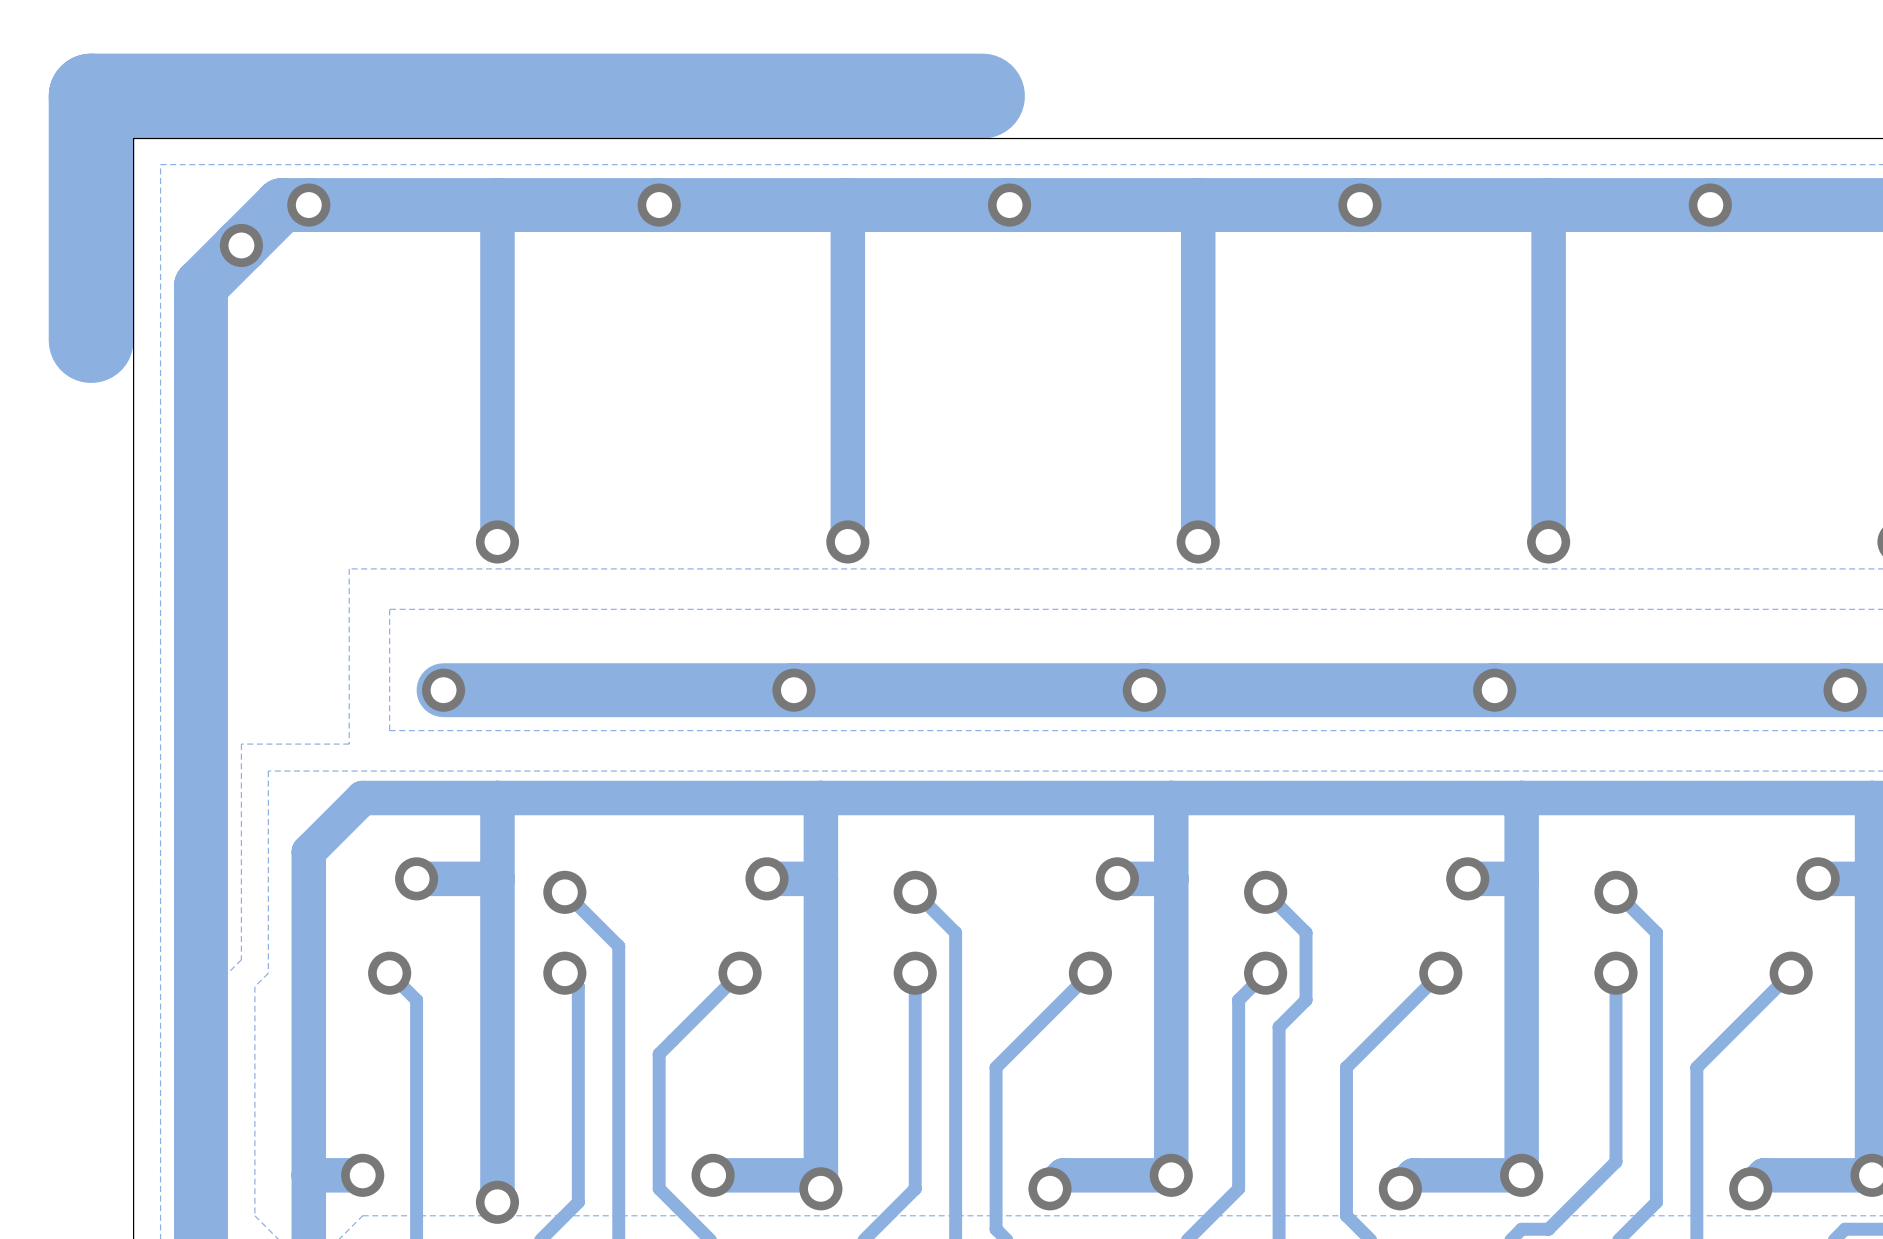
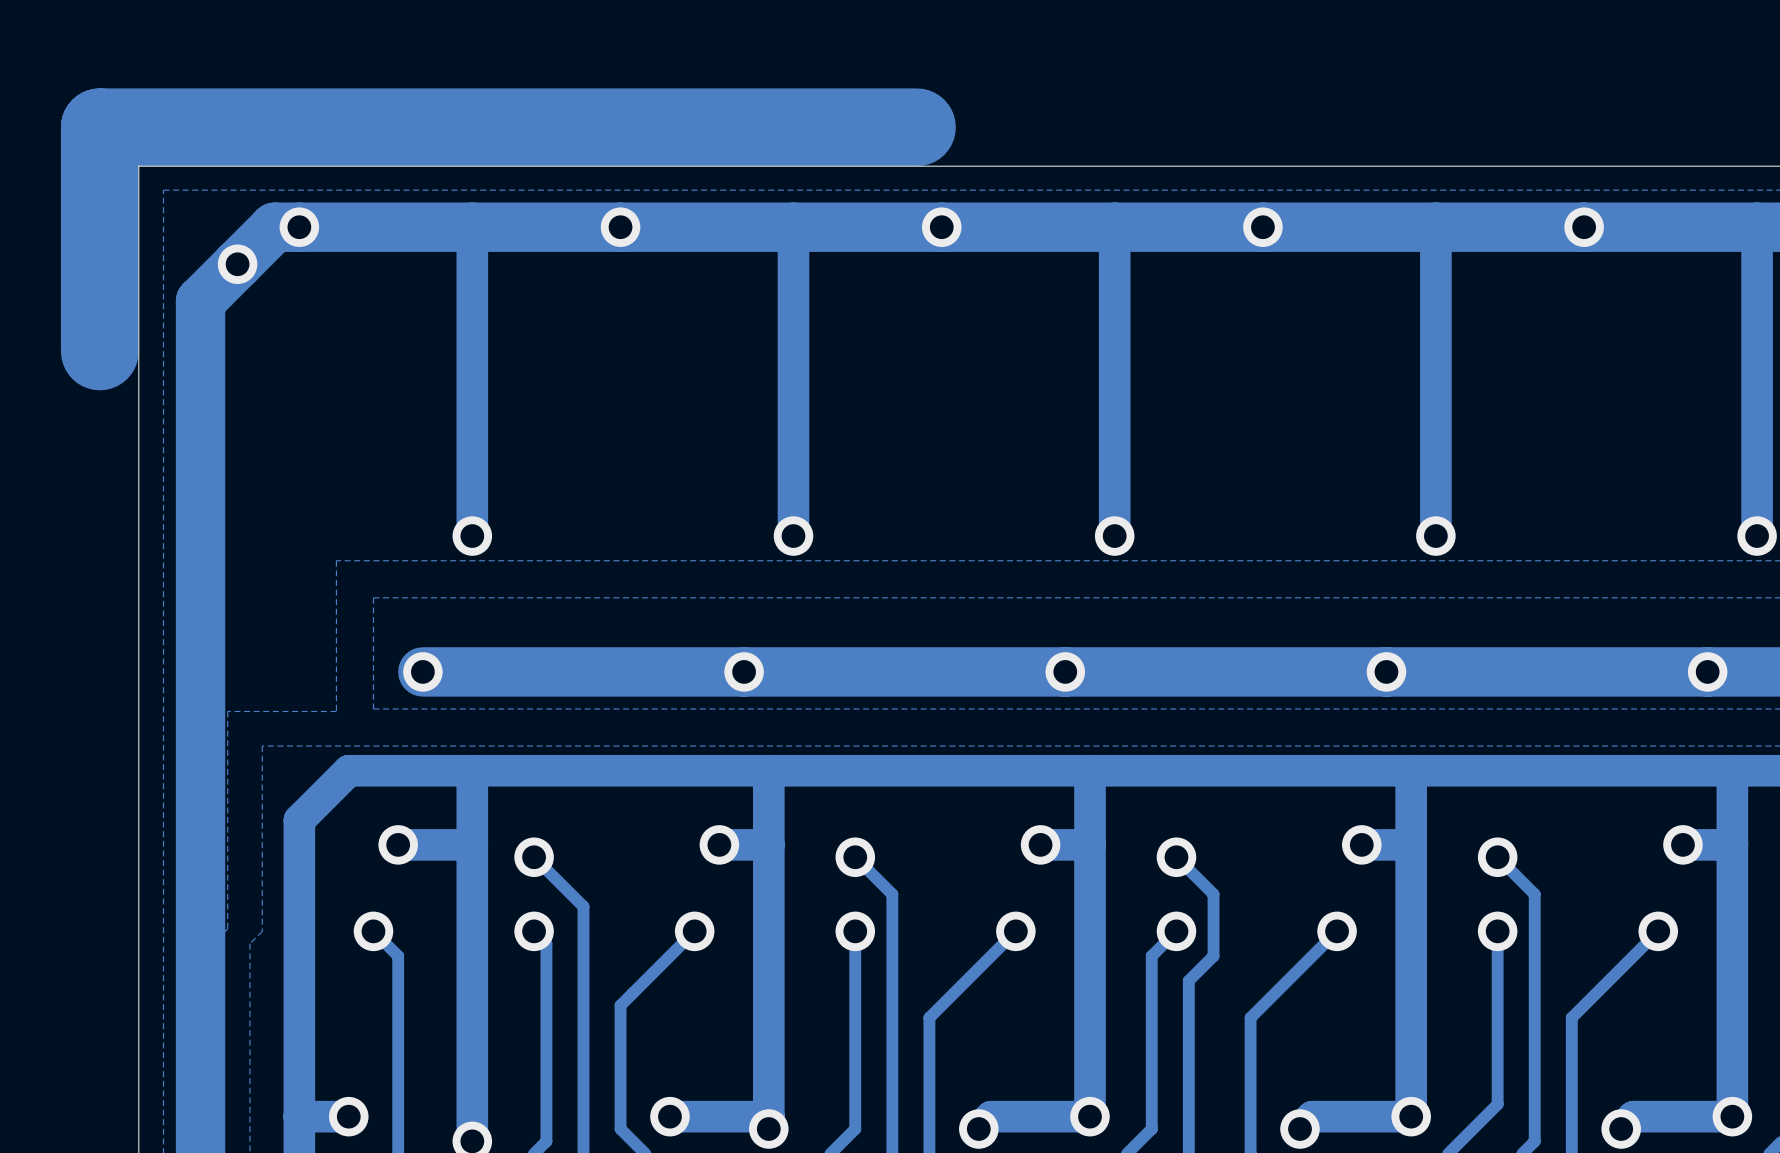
zone outline: (349, 733) (349, 744) (241, 744) (241, 959) (230, 970) -> (336, 711) (227, 711) (227, 928)

